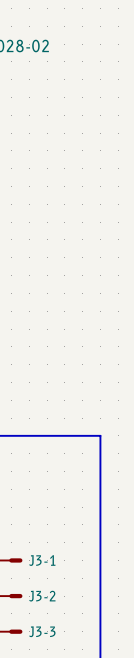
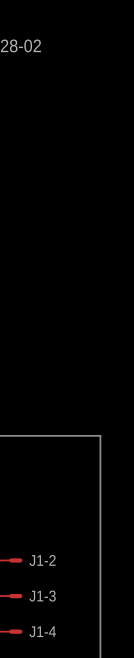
J3-1 name: J3-1 (42, 560) -> J1-2 (42, 560)
J3-2 name: J3-2 (42, 596) -> J1-3 (42, 596)
J3-3 name: J3-3 (42, 631) -> J1-4 (42, 631)

